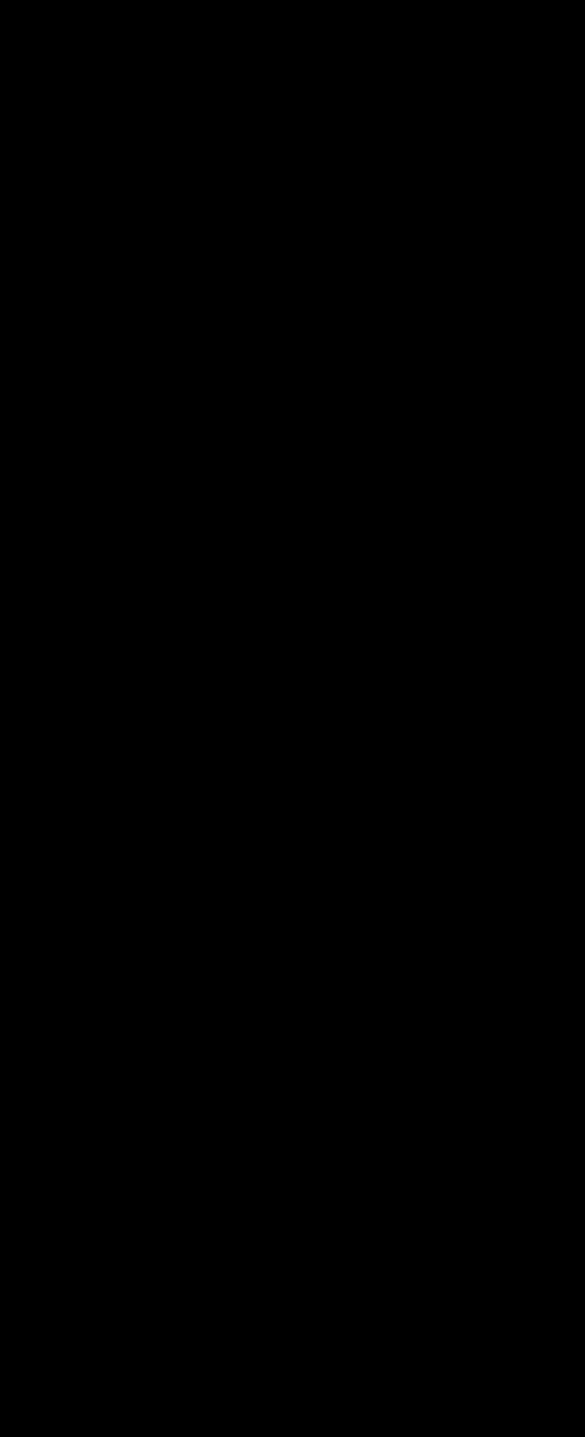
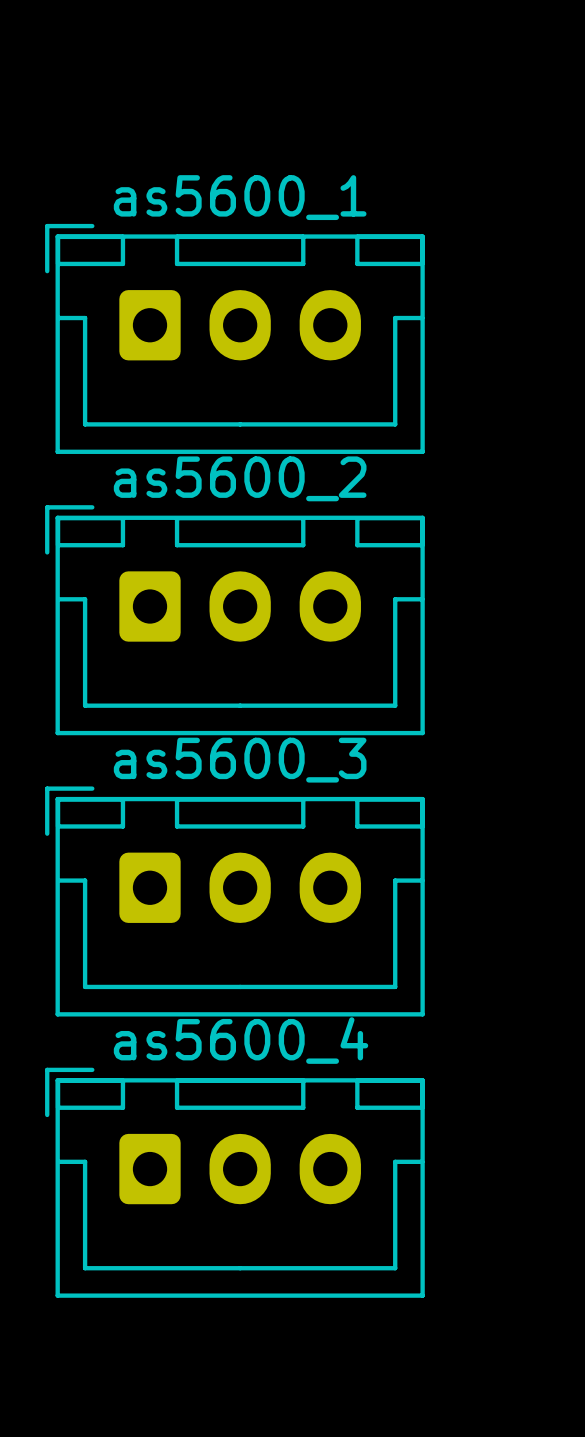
as5600_1: none -> (234, 338)
as5600_2: none -> (234, 620)
as5600_3: none -> (234, 901)
as5600_4: none -> (234, 1182)

